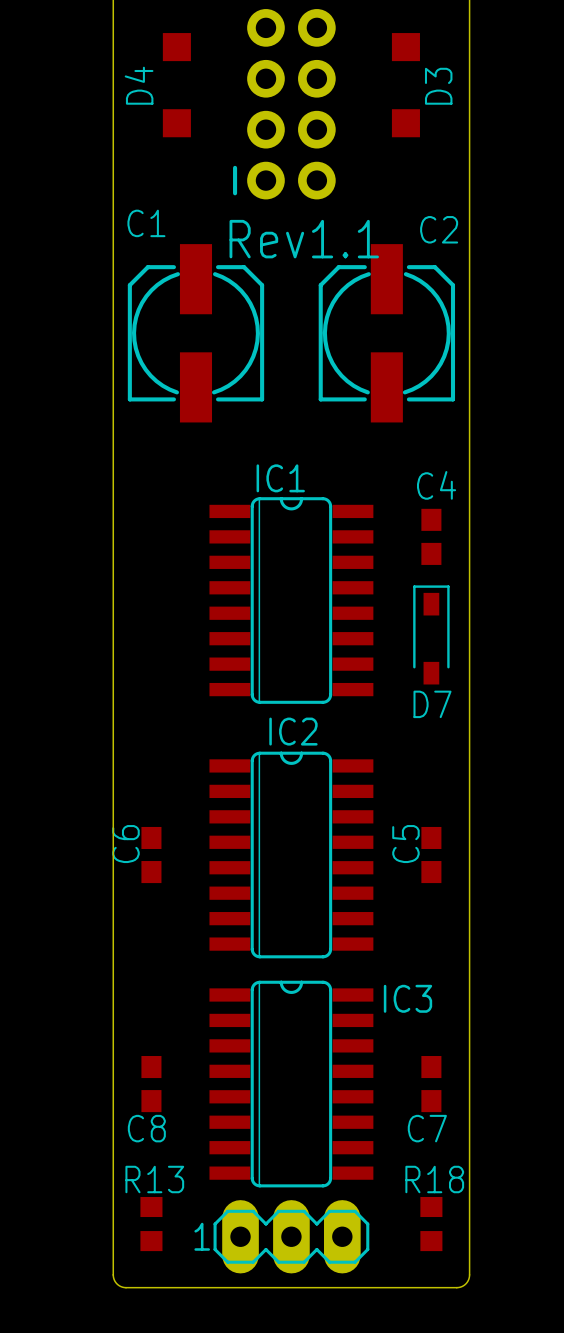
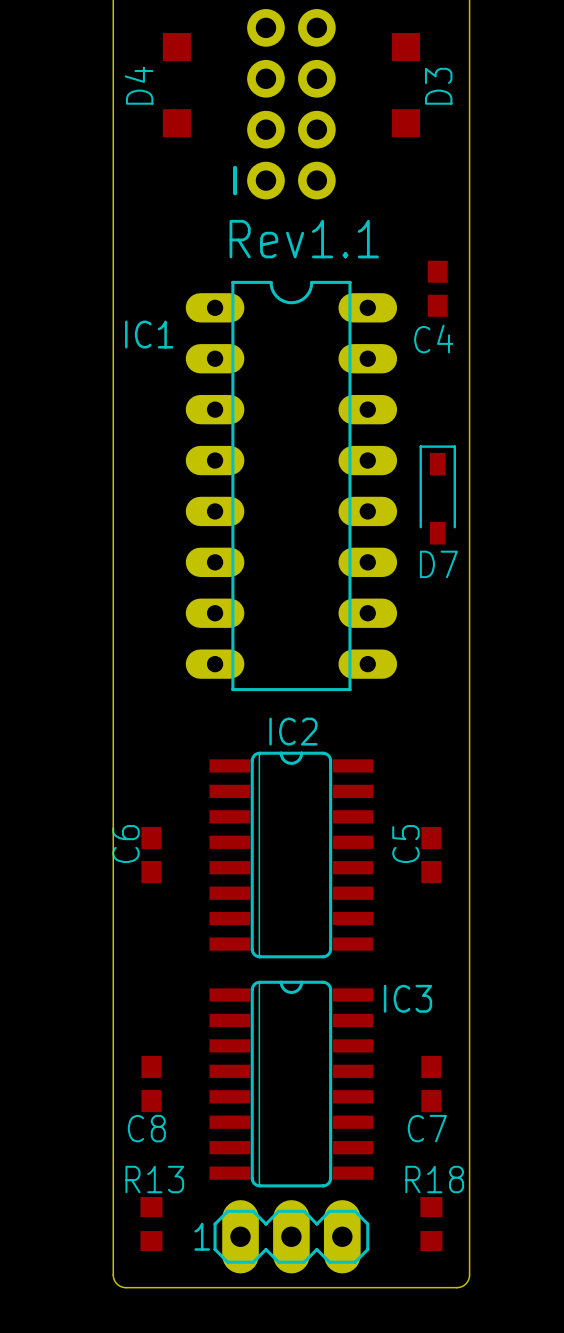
C1: (195, 333) -> none
C2: (386, 333) -> none
IC1 name position: IC1 (280, 478) -> IC1 (149, 334)
C4 name position: C4 (436, 485) -> C4 (433, 339)
IC1 footprint: [209, 497, 374, 704] -> [185, 280, 398, 692]
C4 position: (431, 536) -> (437, 288)
D7 position: (431, 634) -> (437, 494)

